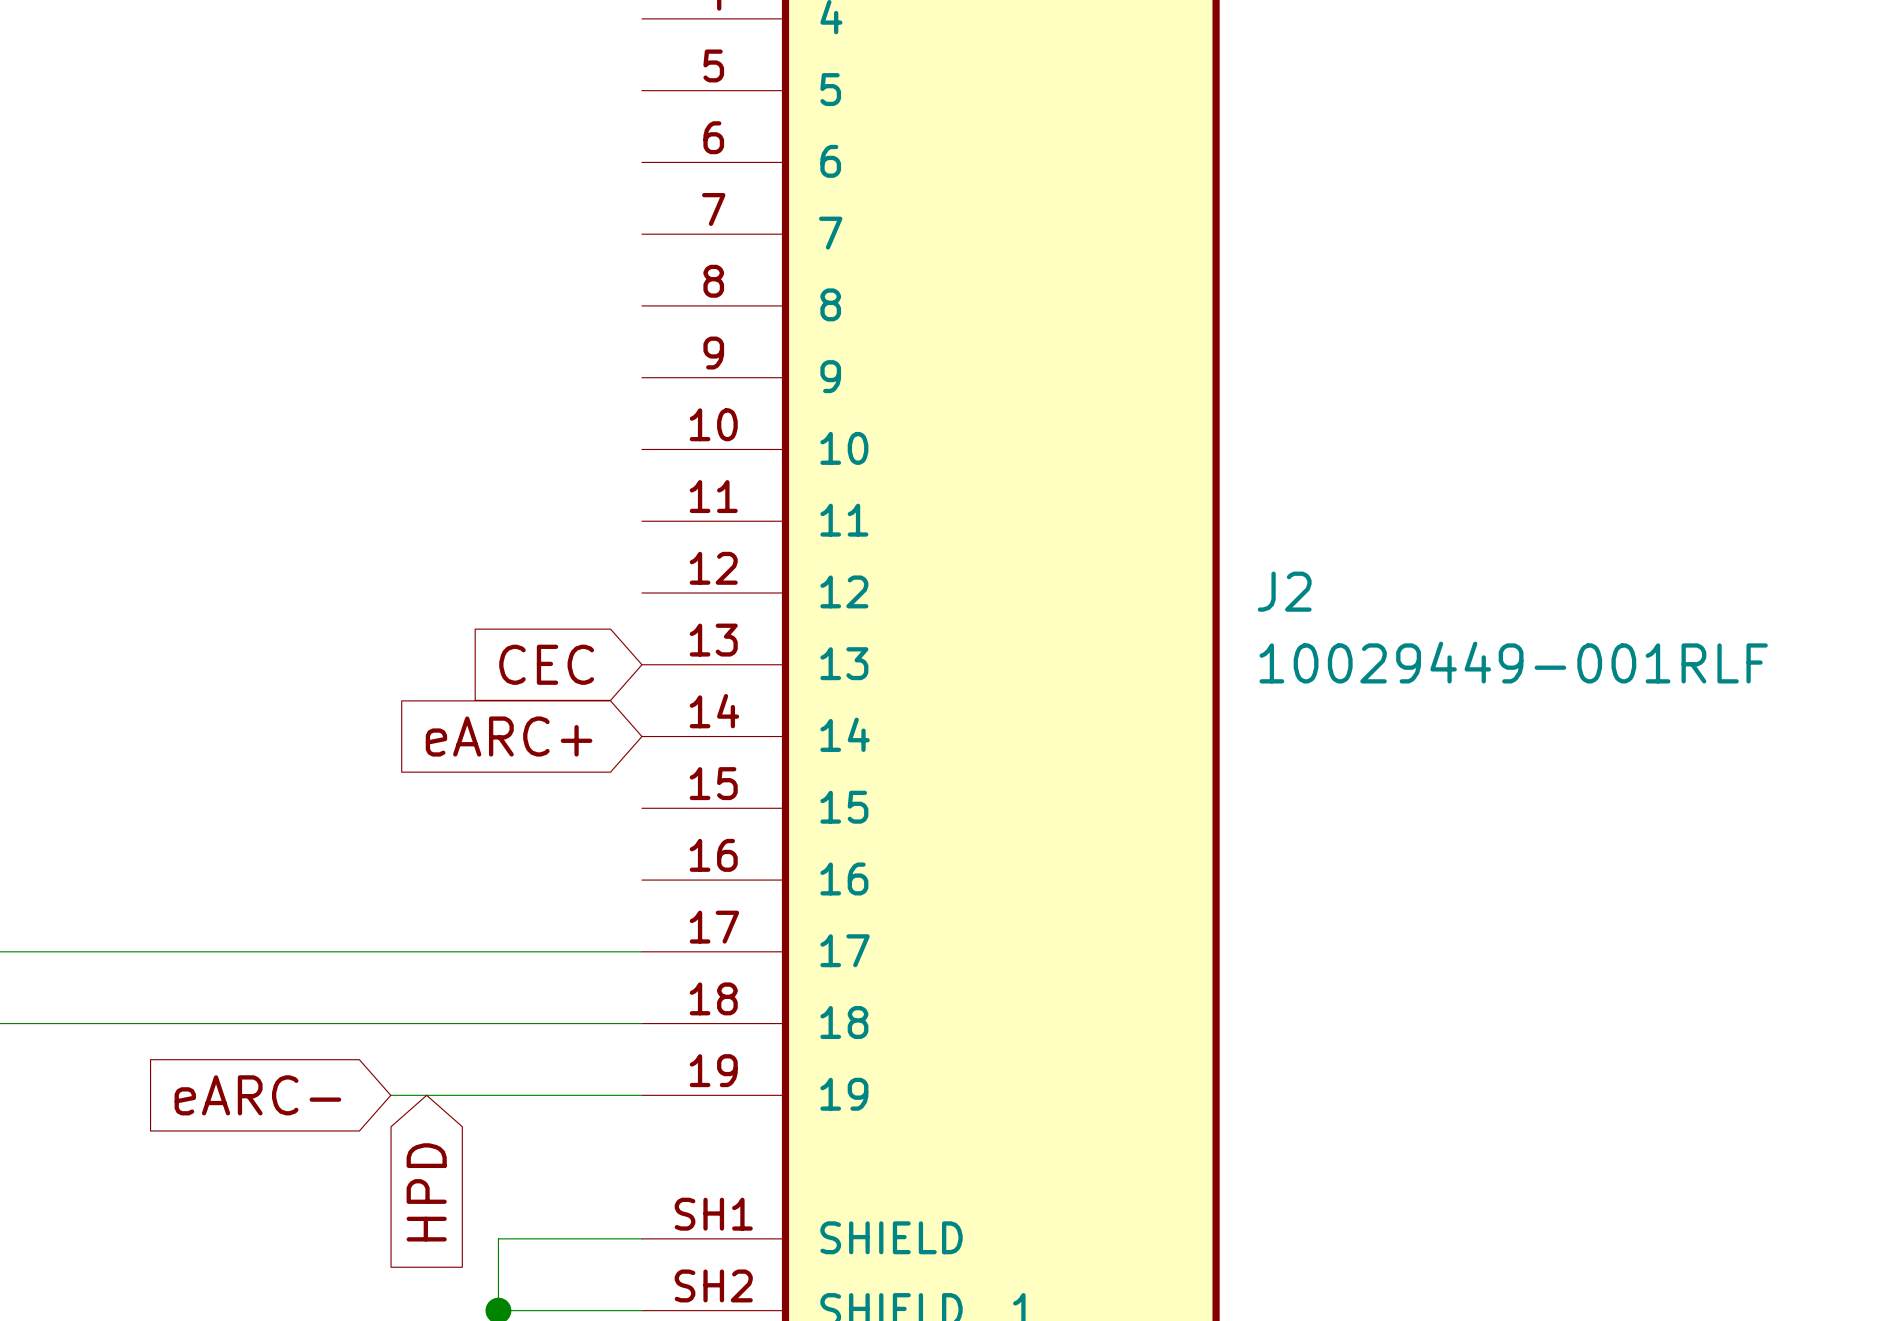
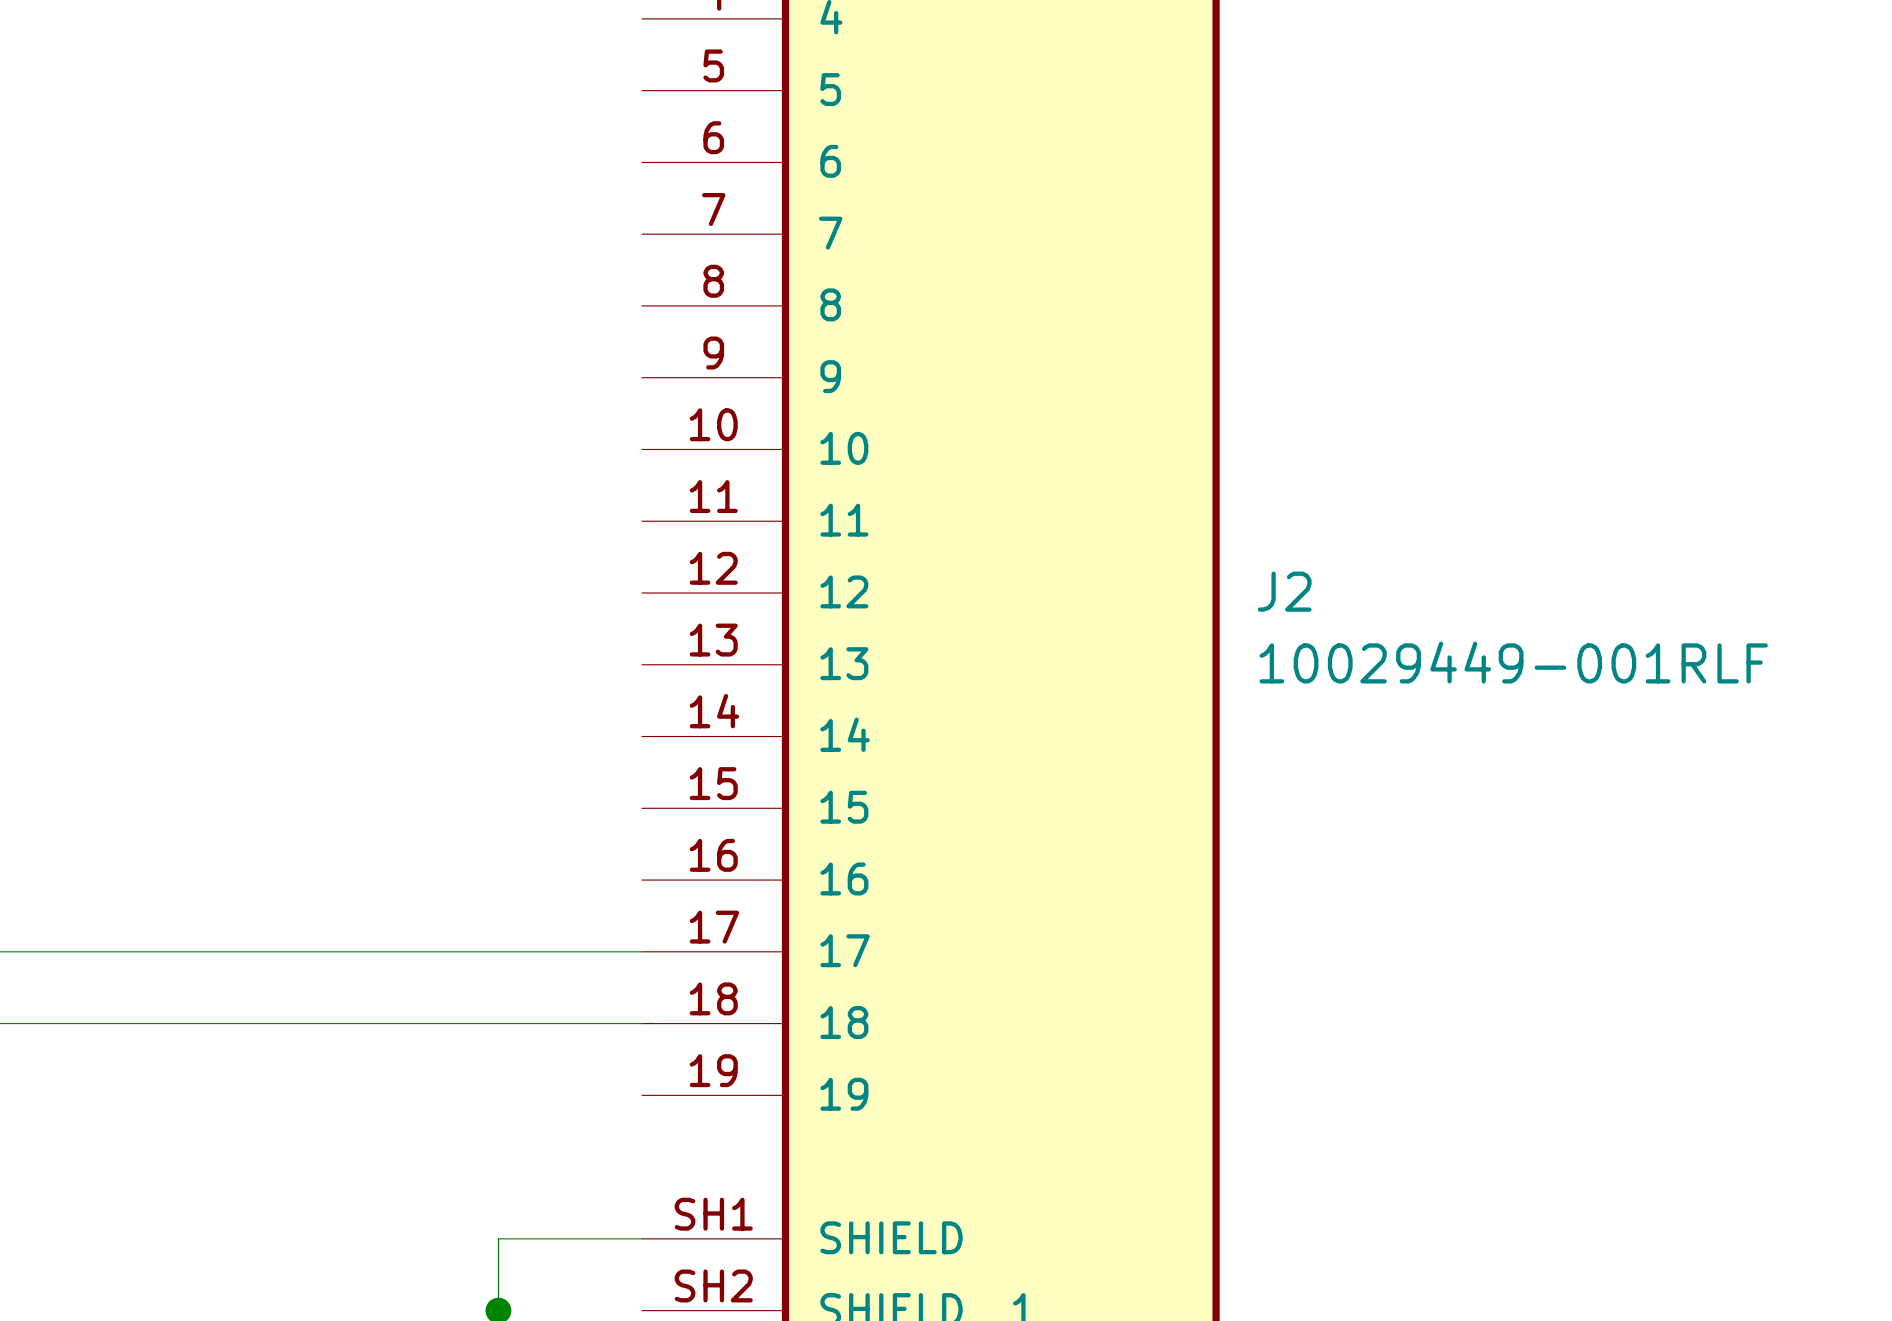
global label: CEC (546, 664) -> none
global label: eARC+ (509, 736) -> none
global label: eARC- (257, 1095) -> none
wire: (390, 1095) (641, 1095) -> none
global label: HPD (426, 1192) -> none
wire: (498, 1310) (641, 1310) -> none

